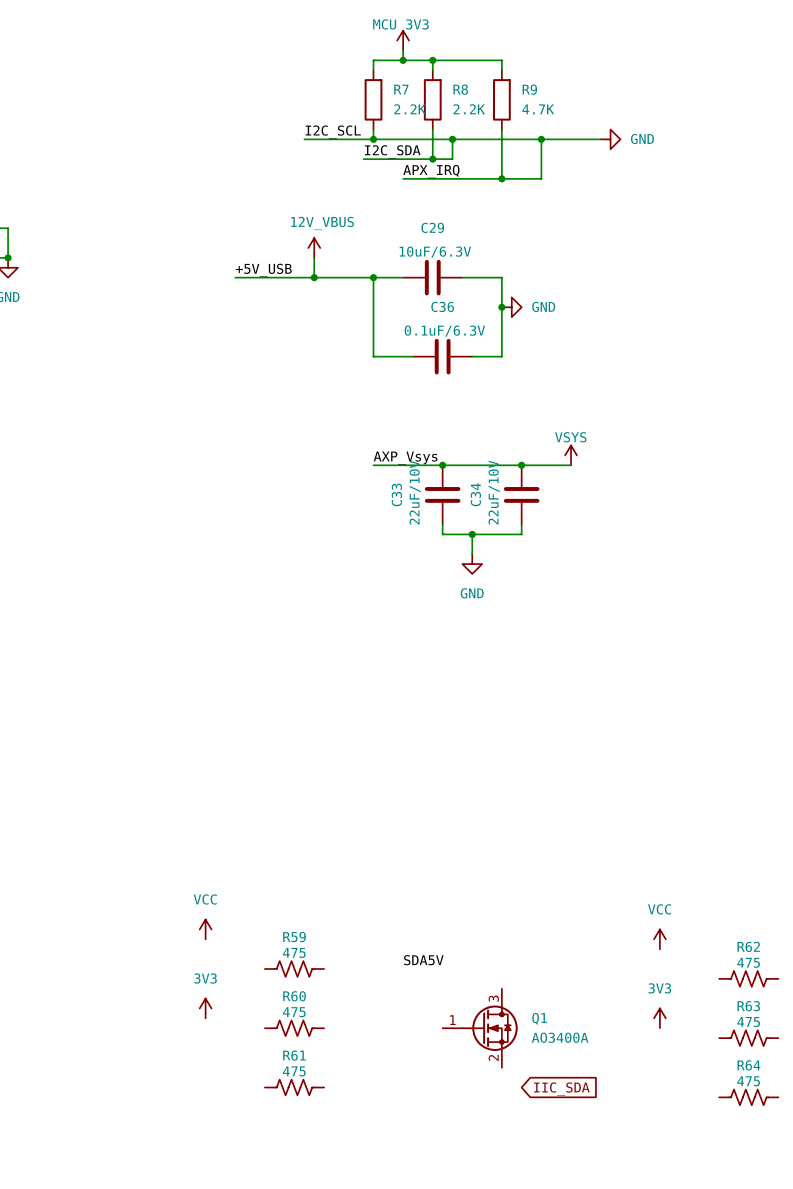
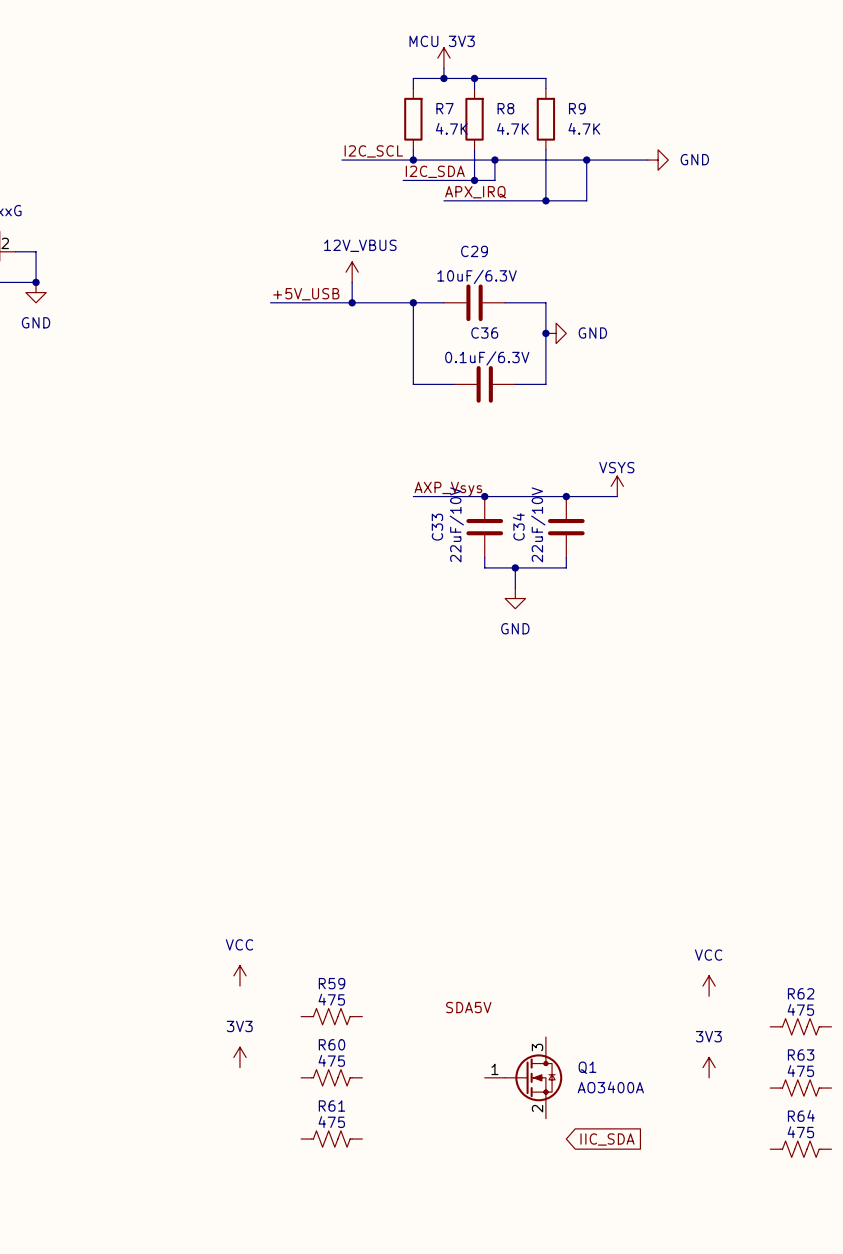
R7 value: 2.2K (410, 109) -> 4.7K (451, 128)
R8 value: 2.2K (469, 109) -> 4.7K (512, 128)

